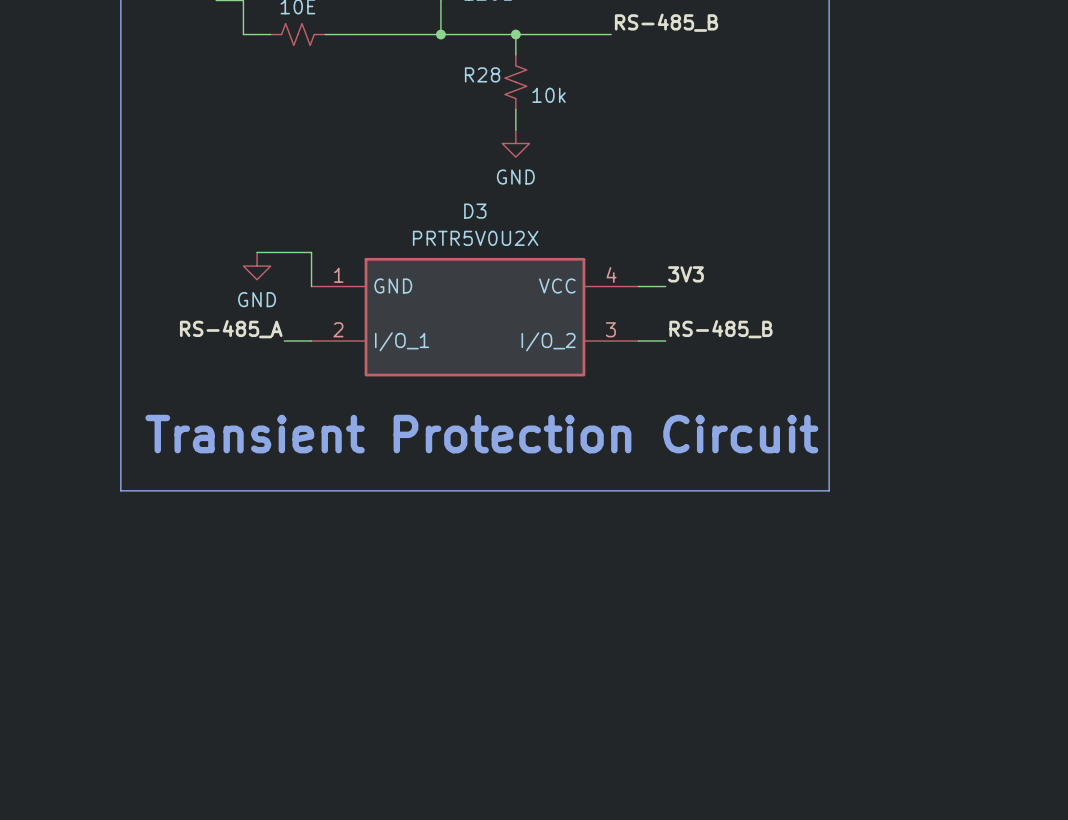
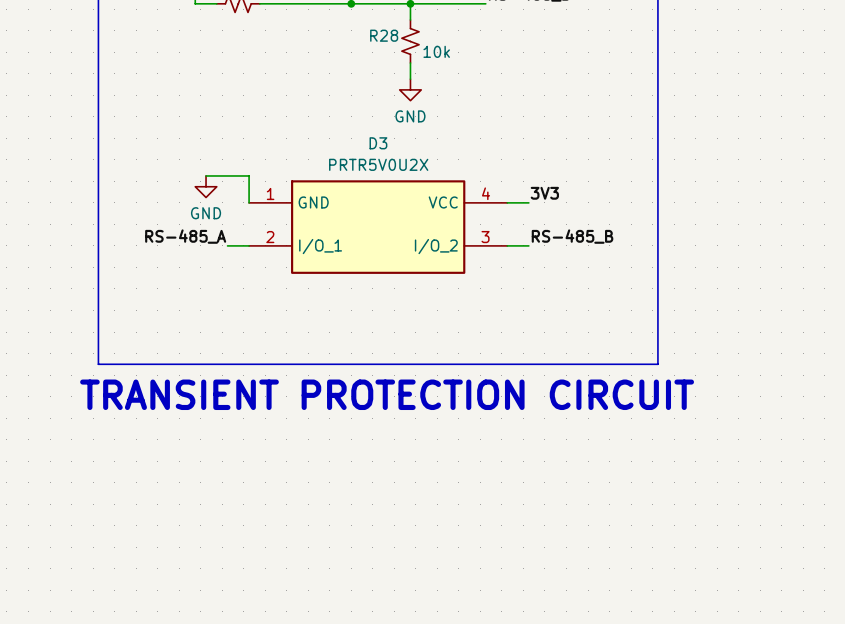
text: Transient Protection Circuit (481, 434) -> none
text: none -> TRANSIENT PROTECTION CIRCUIT (387, 394)

